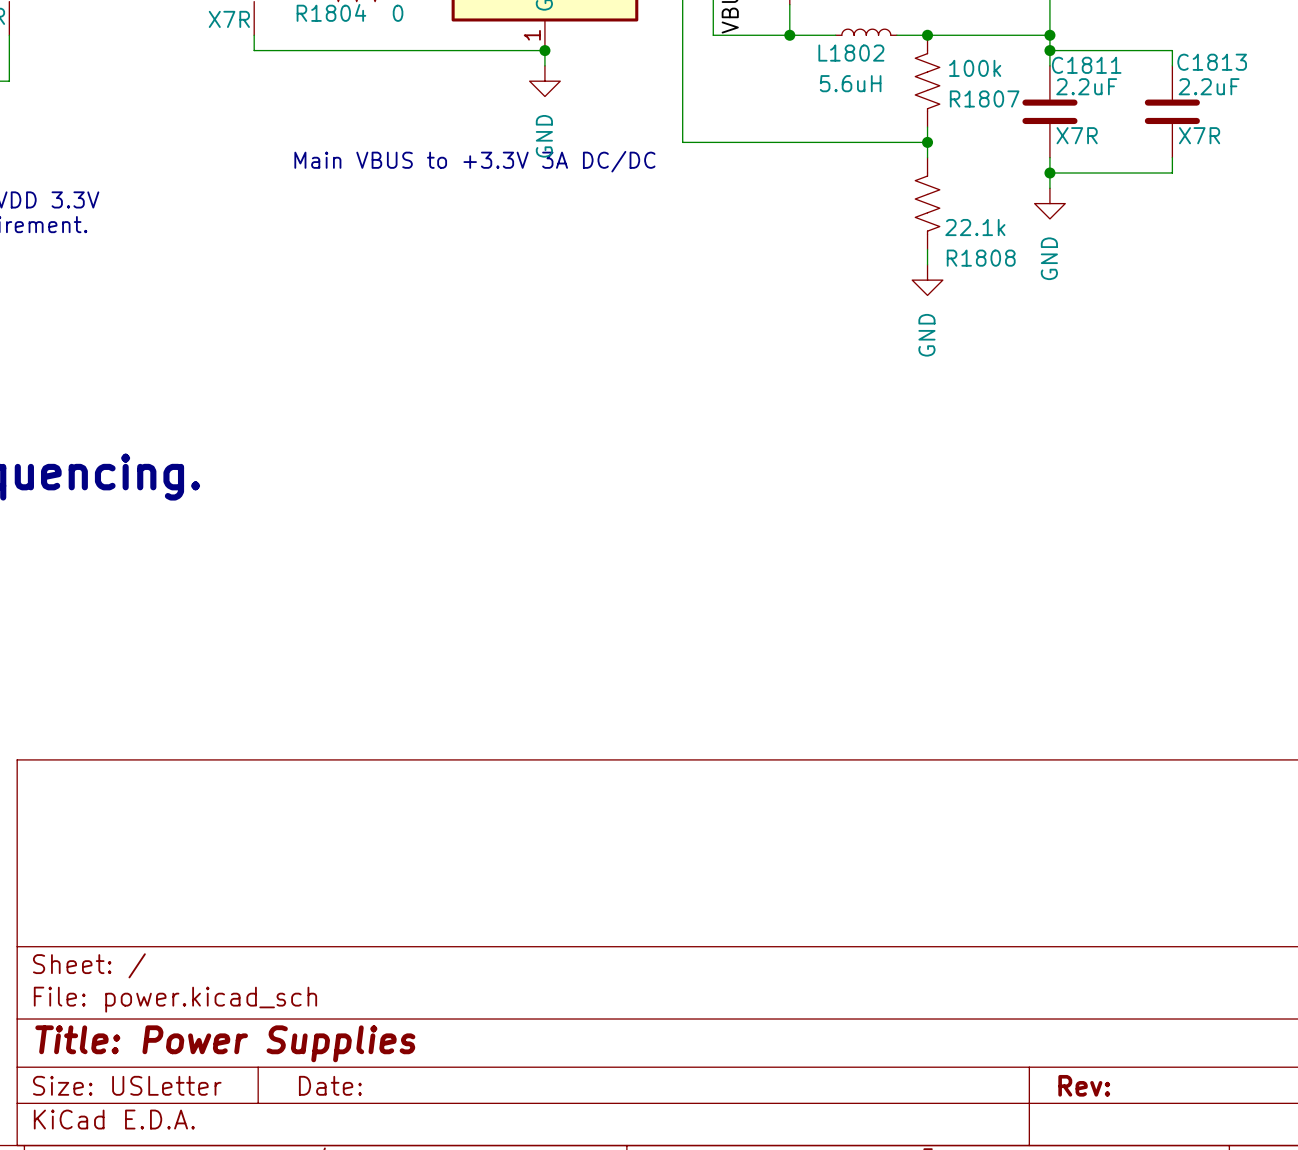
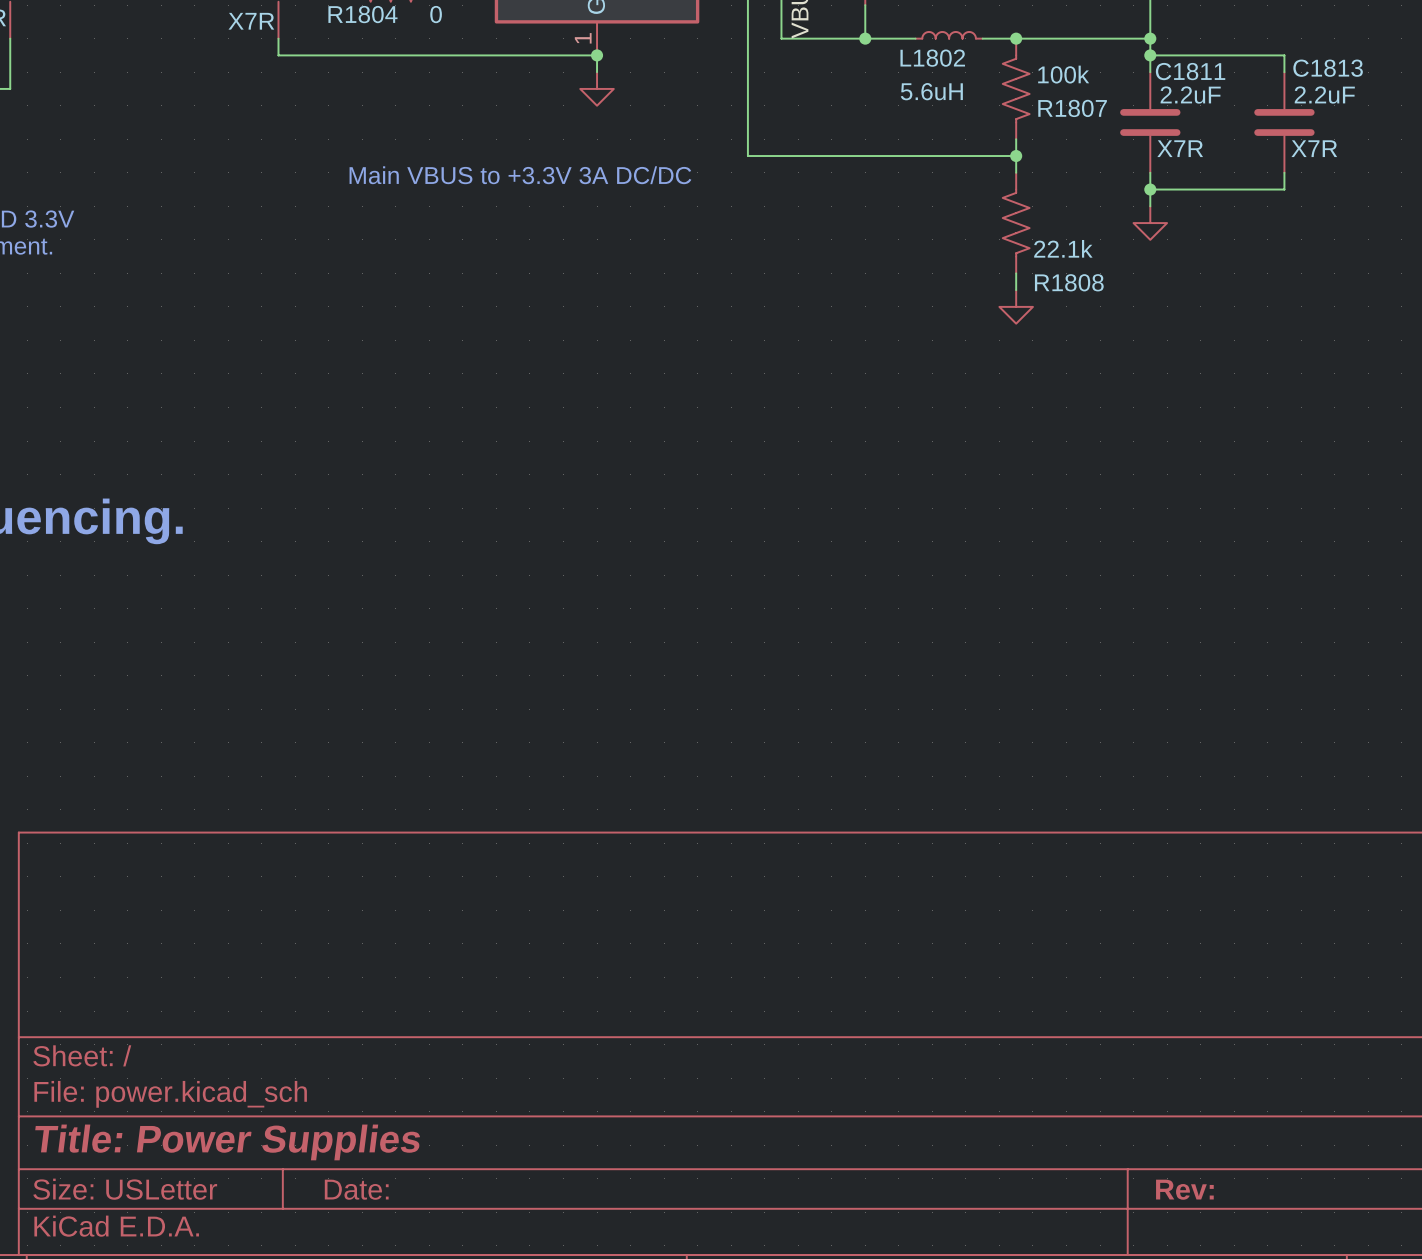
power symbol text: GND (544, 136) -> none
power symbol text: GND (1049, 258) -> none
power symbol text: GND (926, 335) -> none

